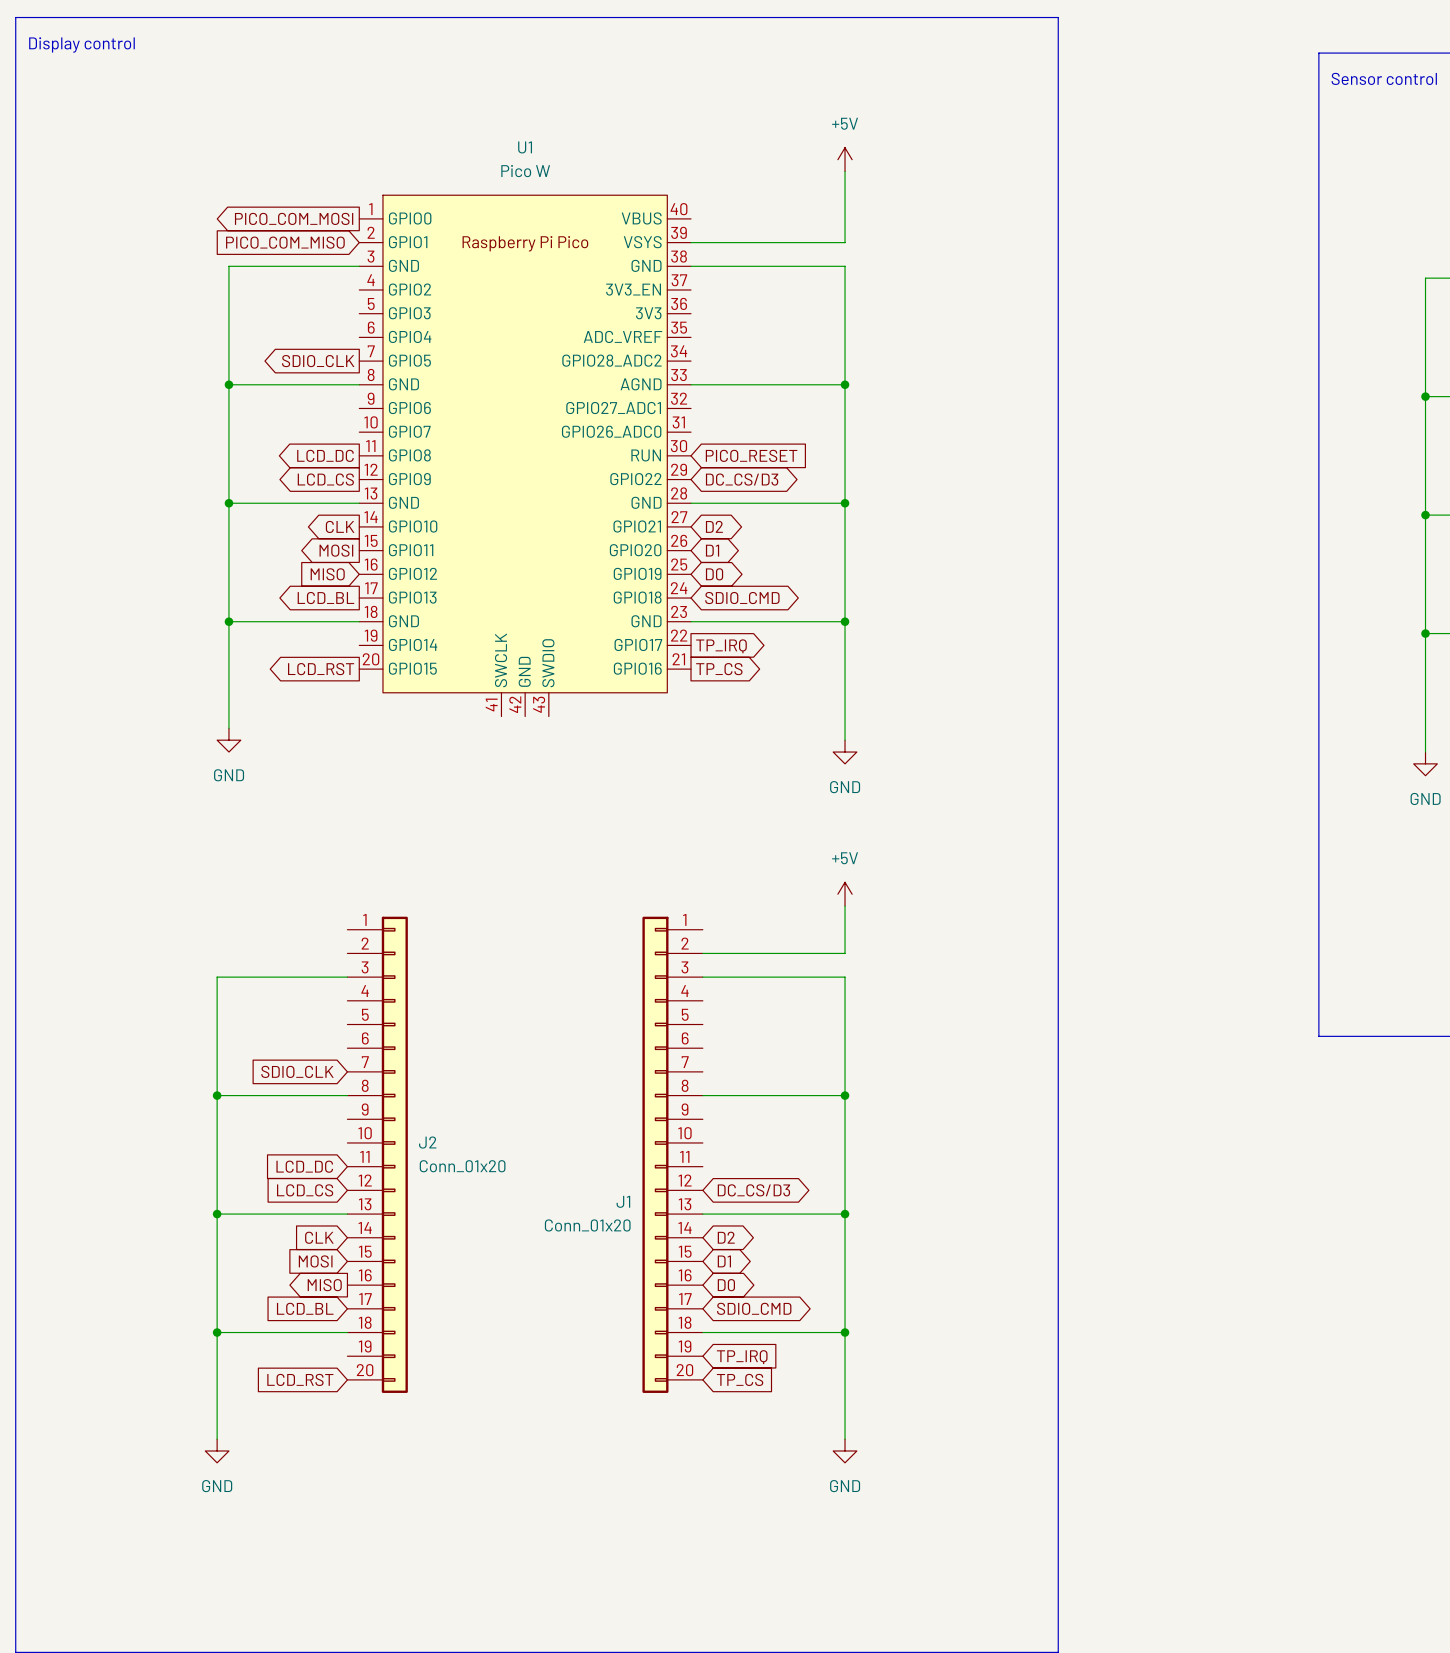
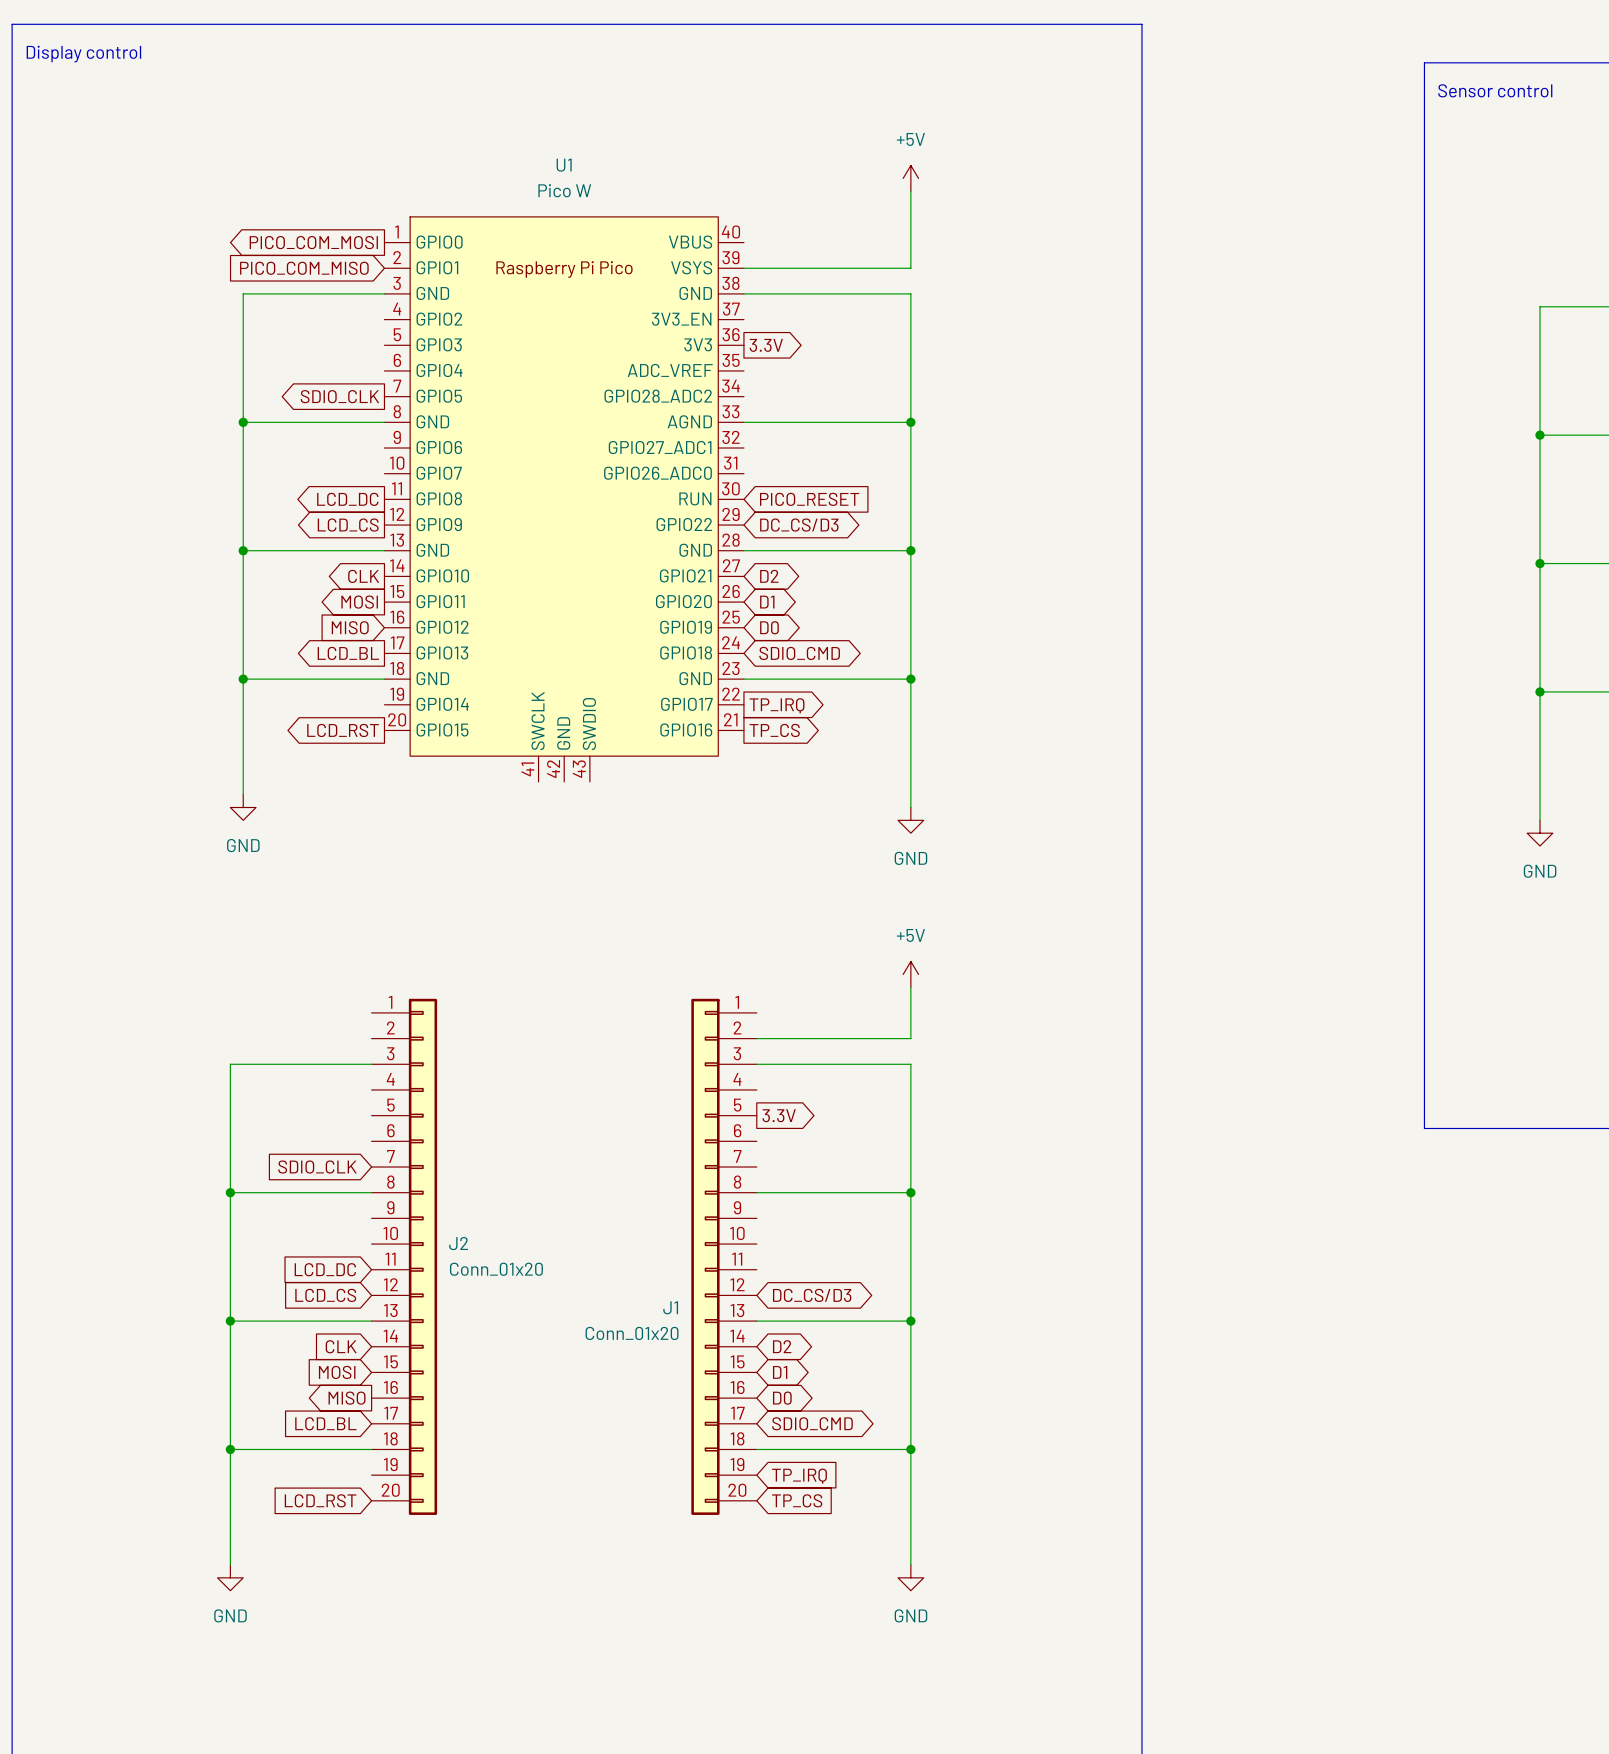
global label: none -> 3.3V (766, 345)
global label: none -> 3.3V (779, 1115)

